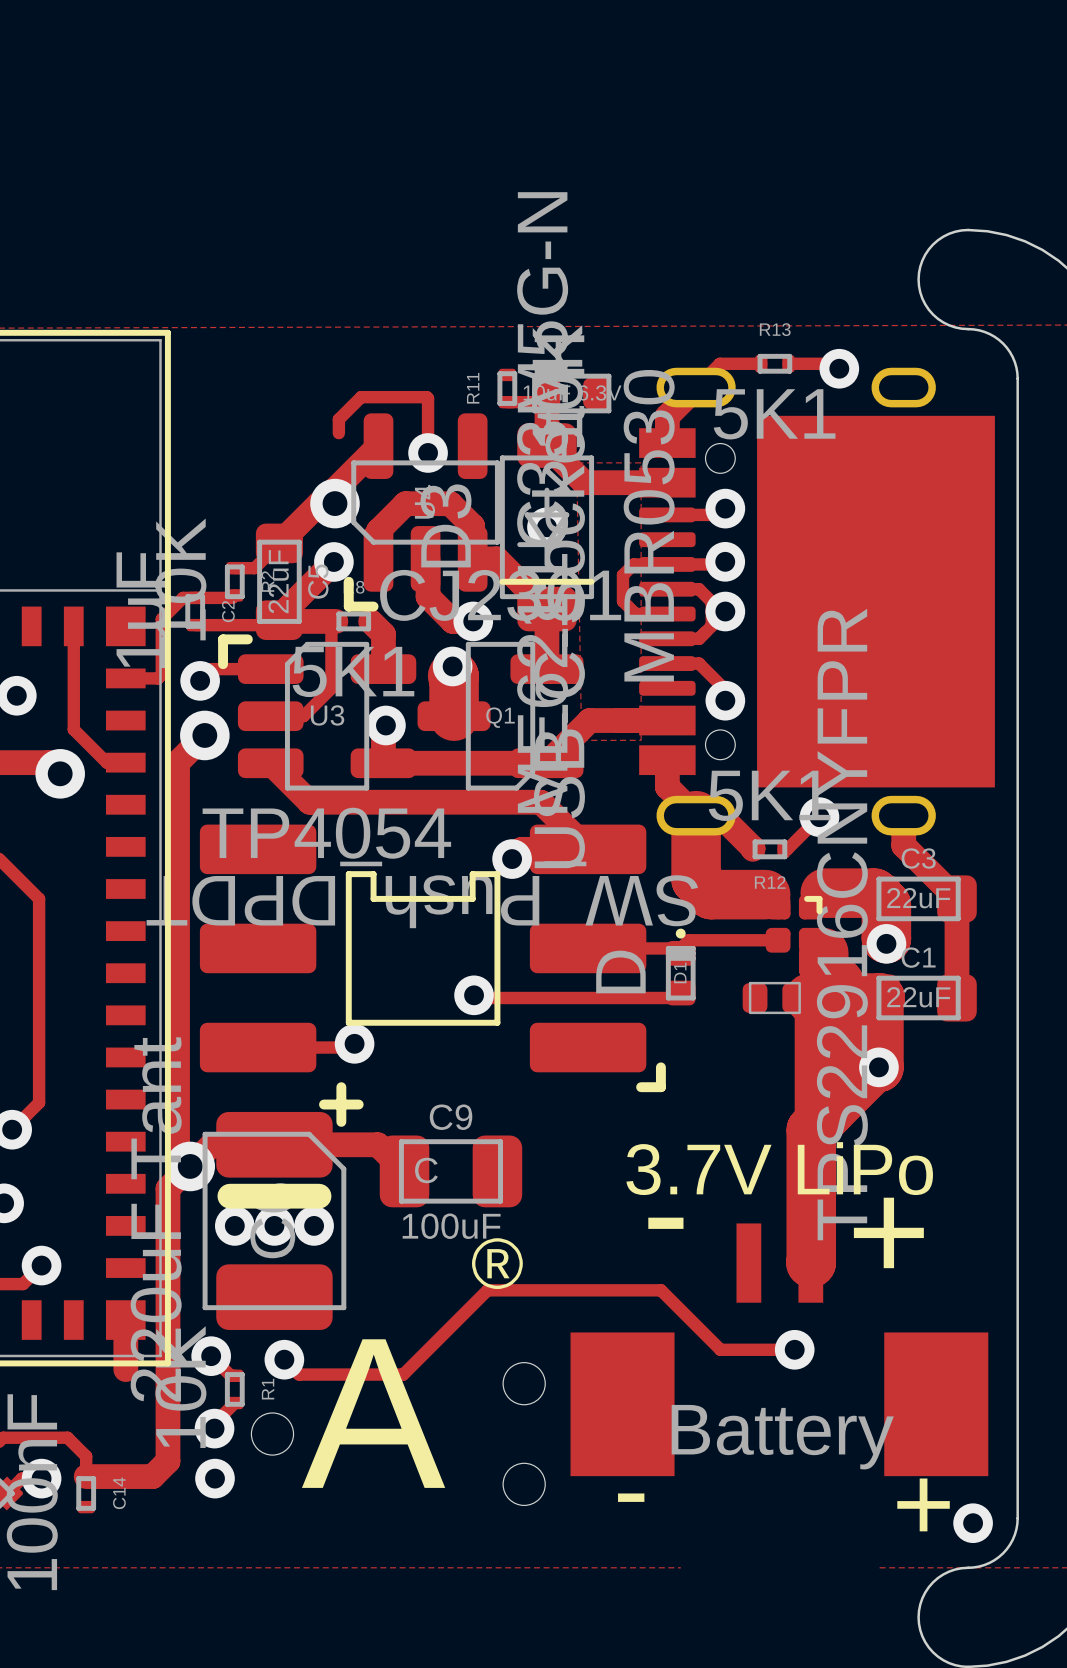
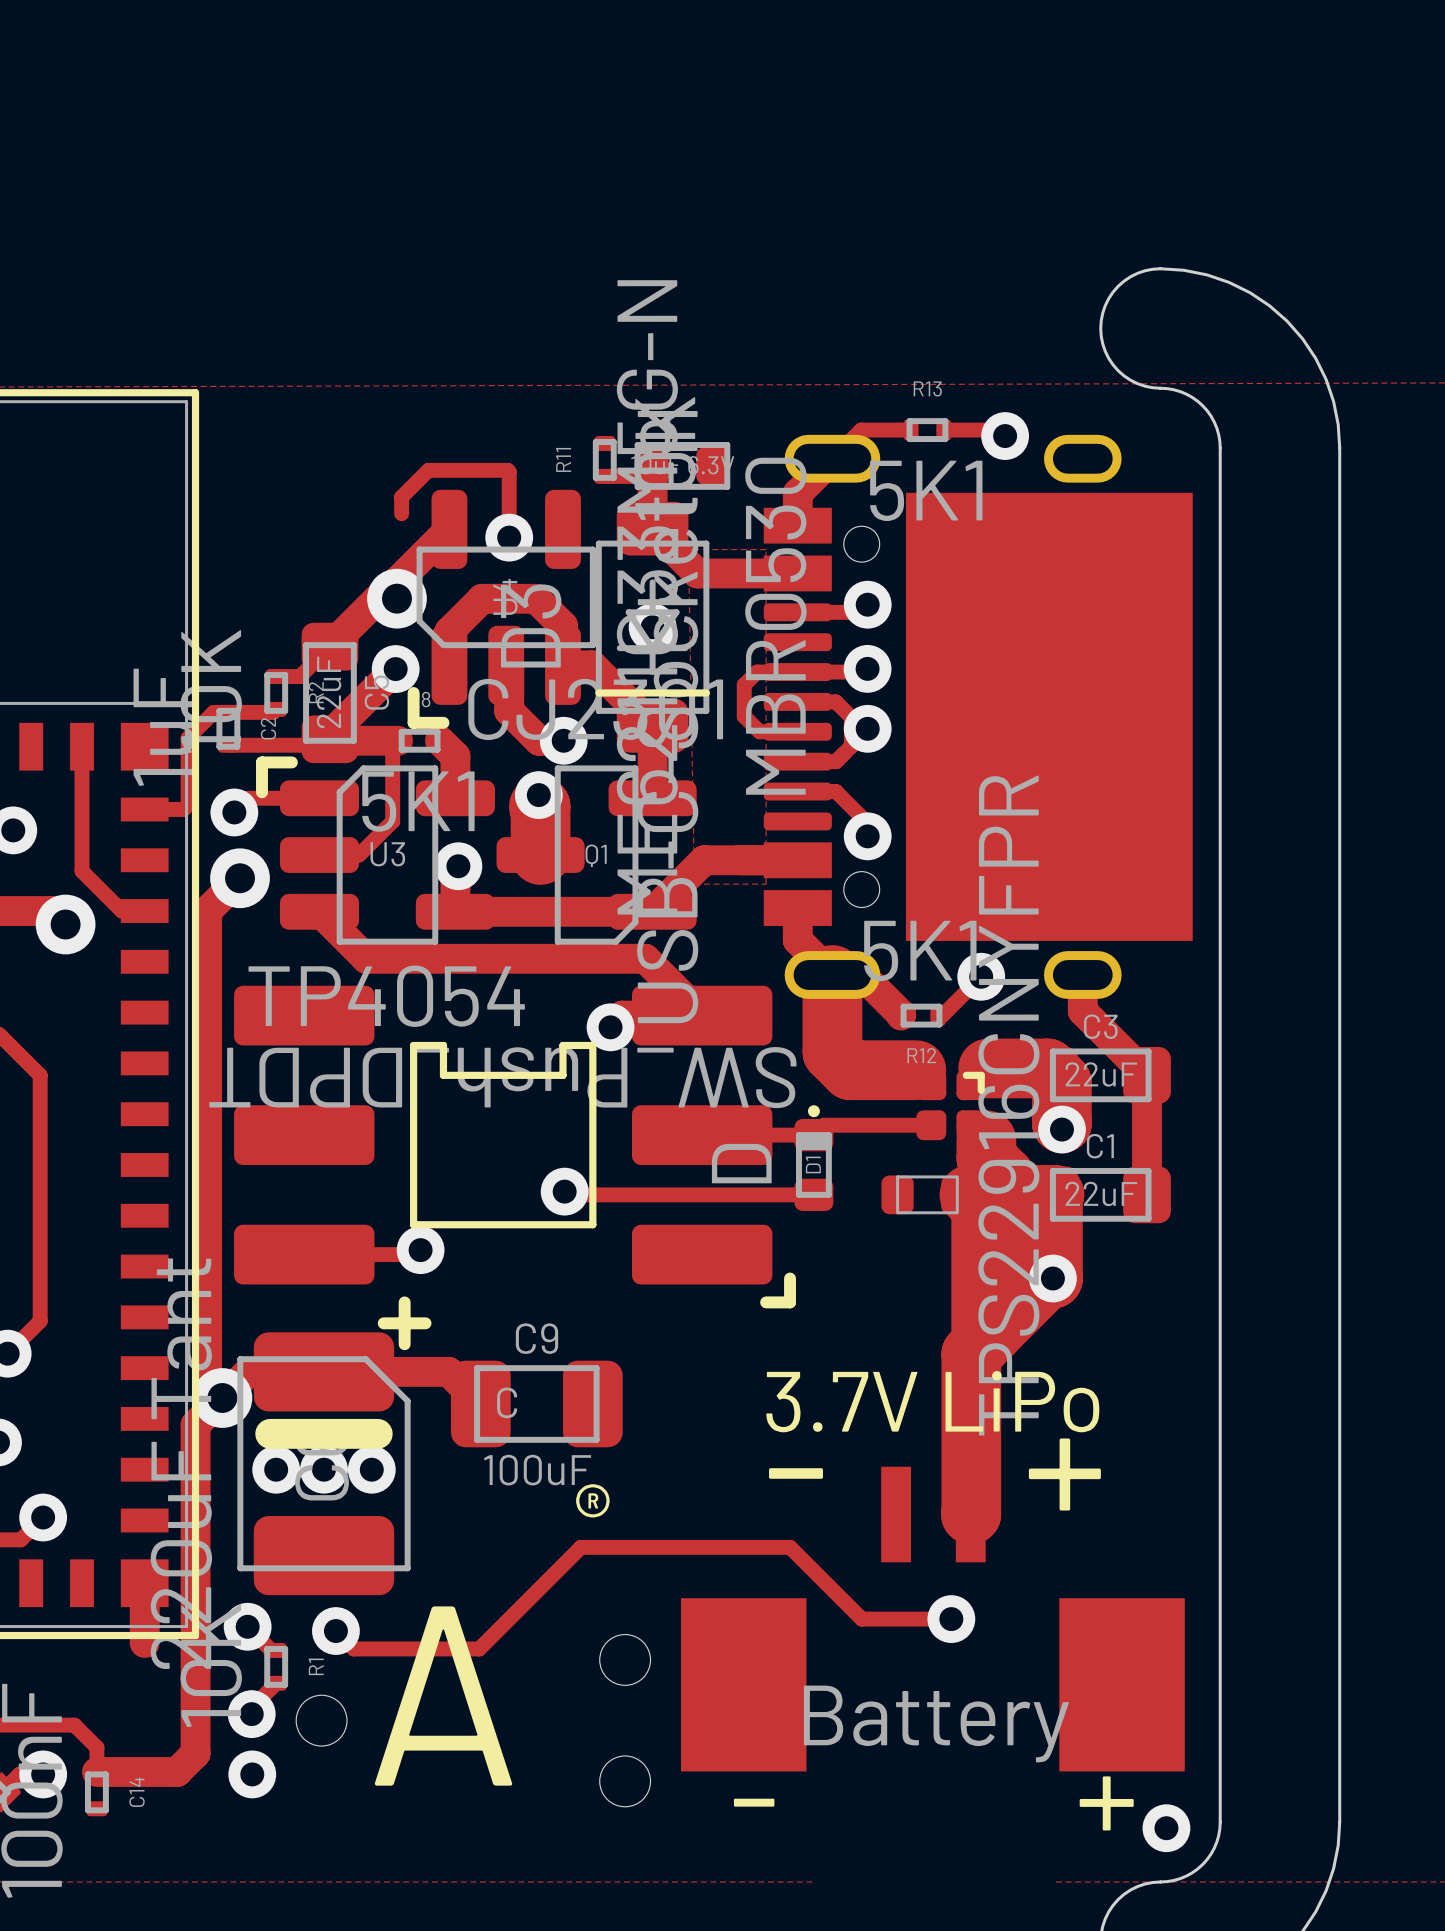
D1 footprint: [665, 928, 696, 1006] -> [794, 1105, 834, 1211]
part footprint: [742, 981, 808, 1015] -> [881, 1175, 974, 1215]

